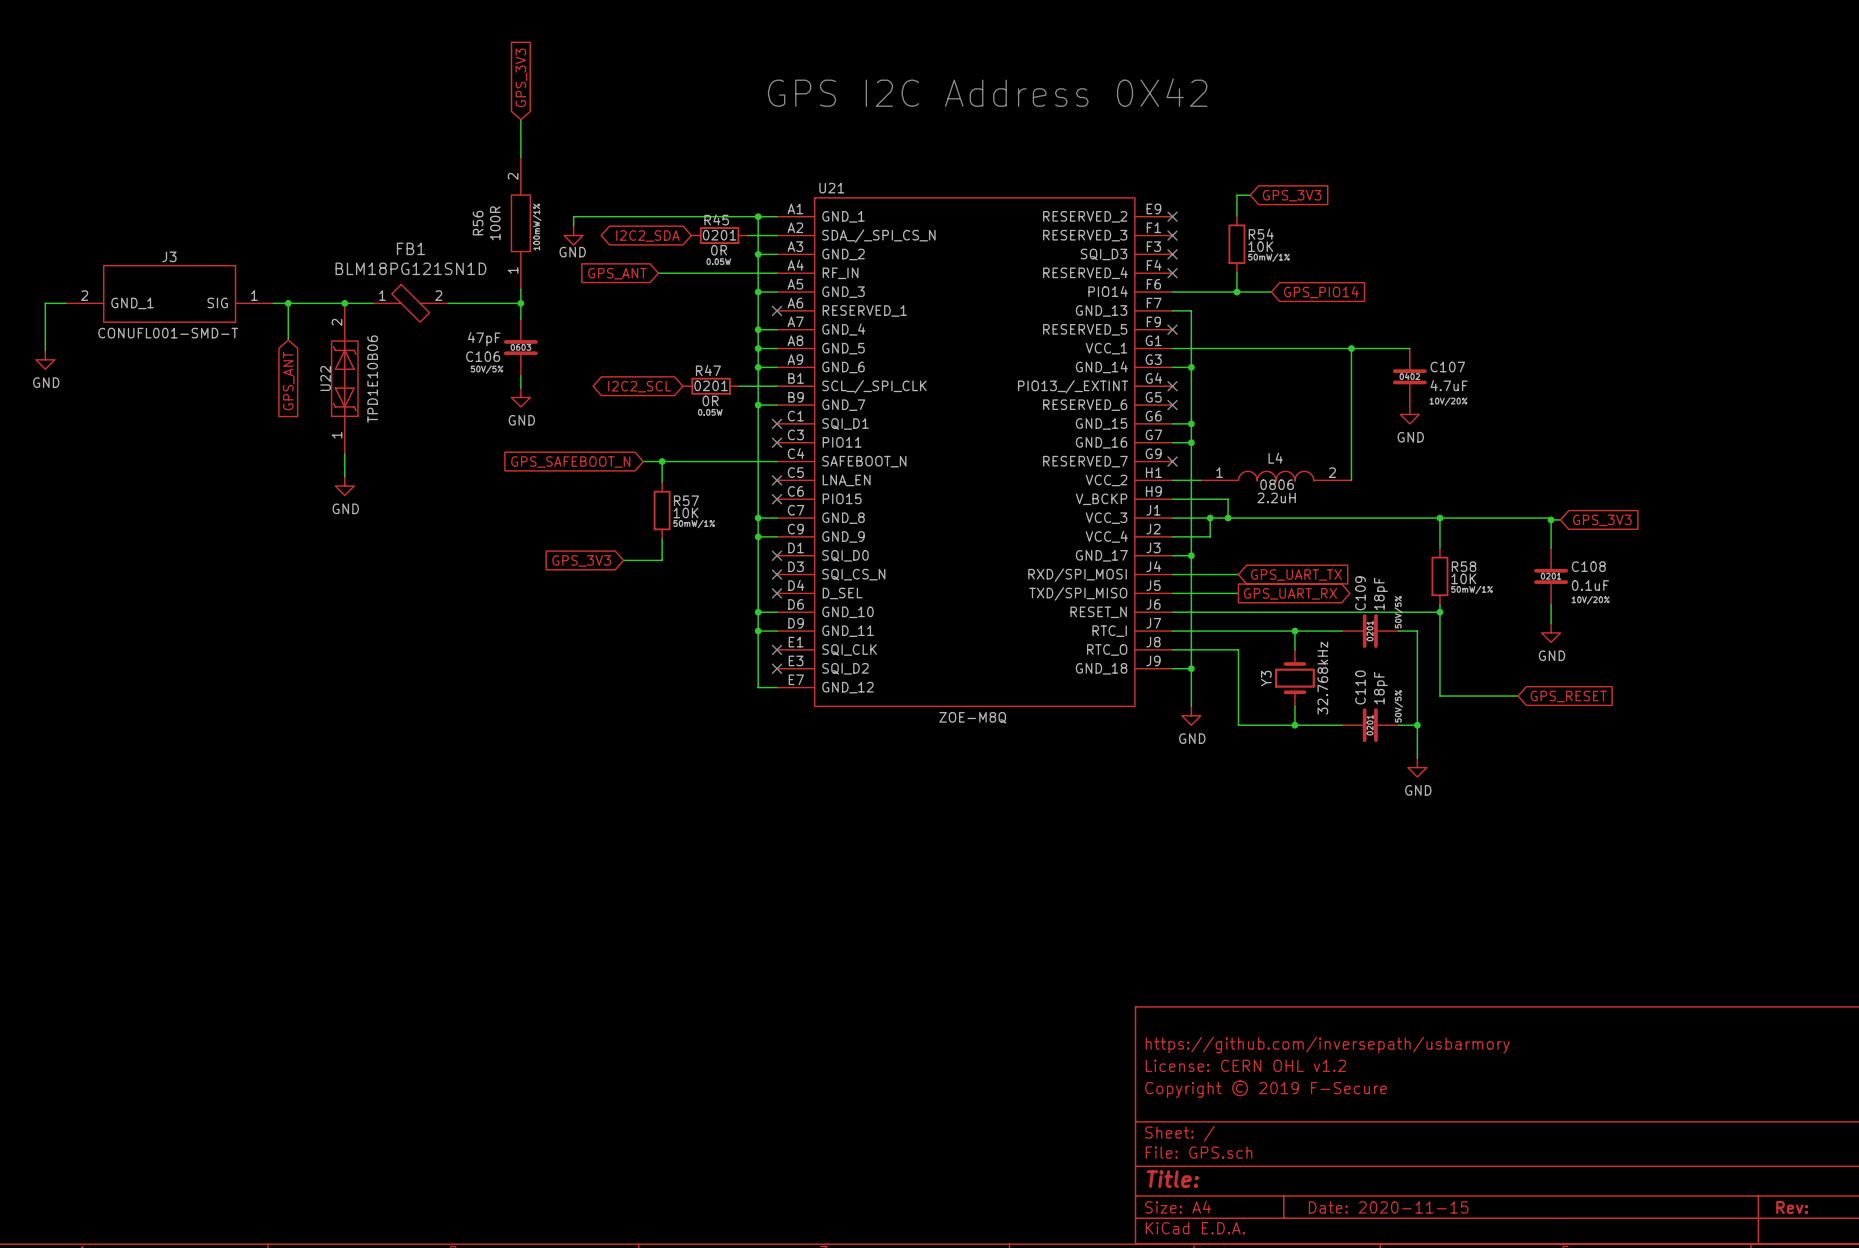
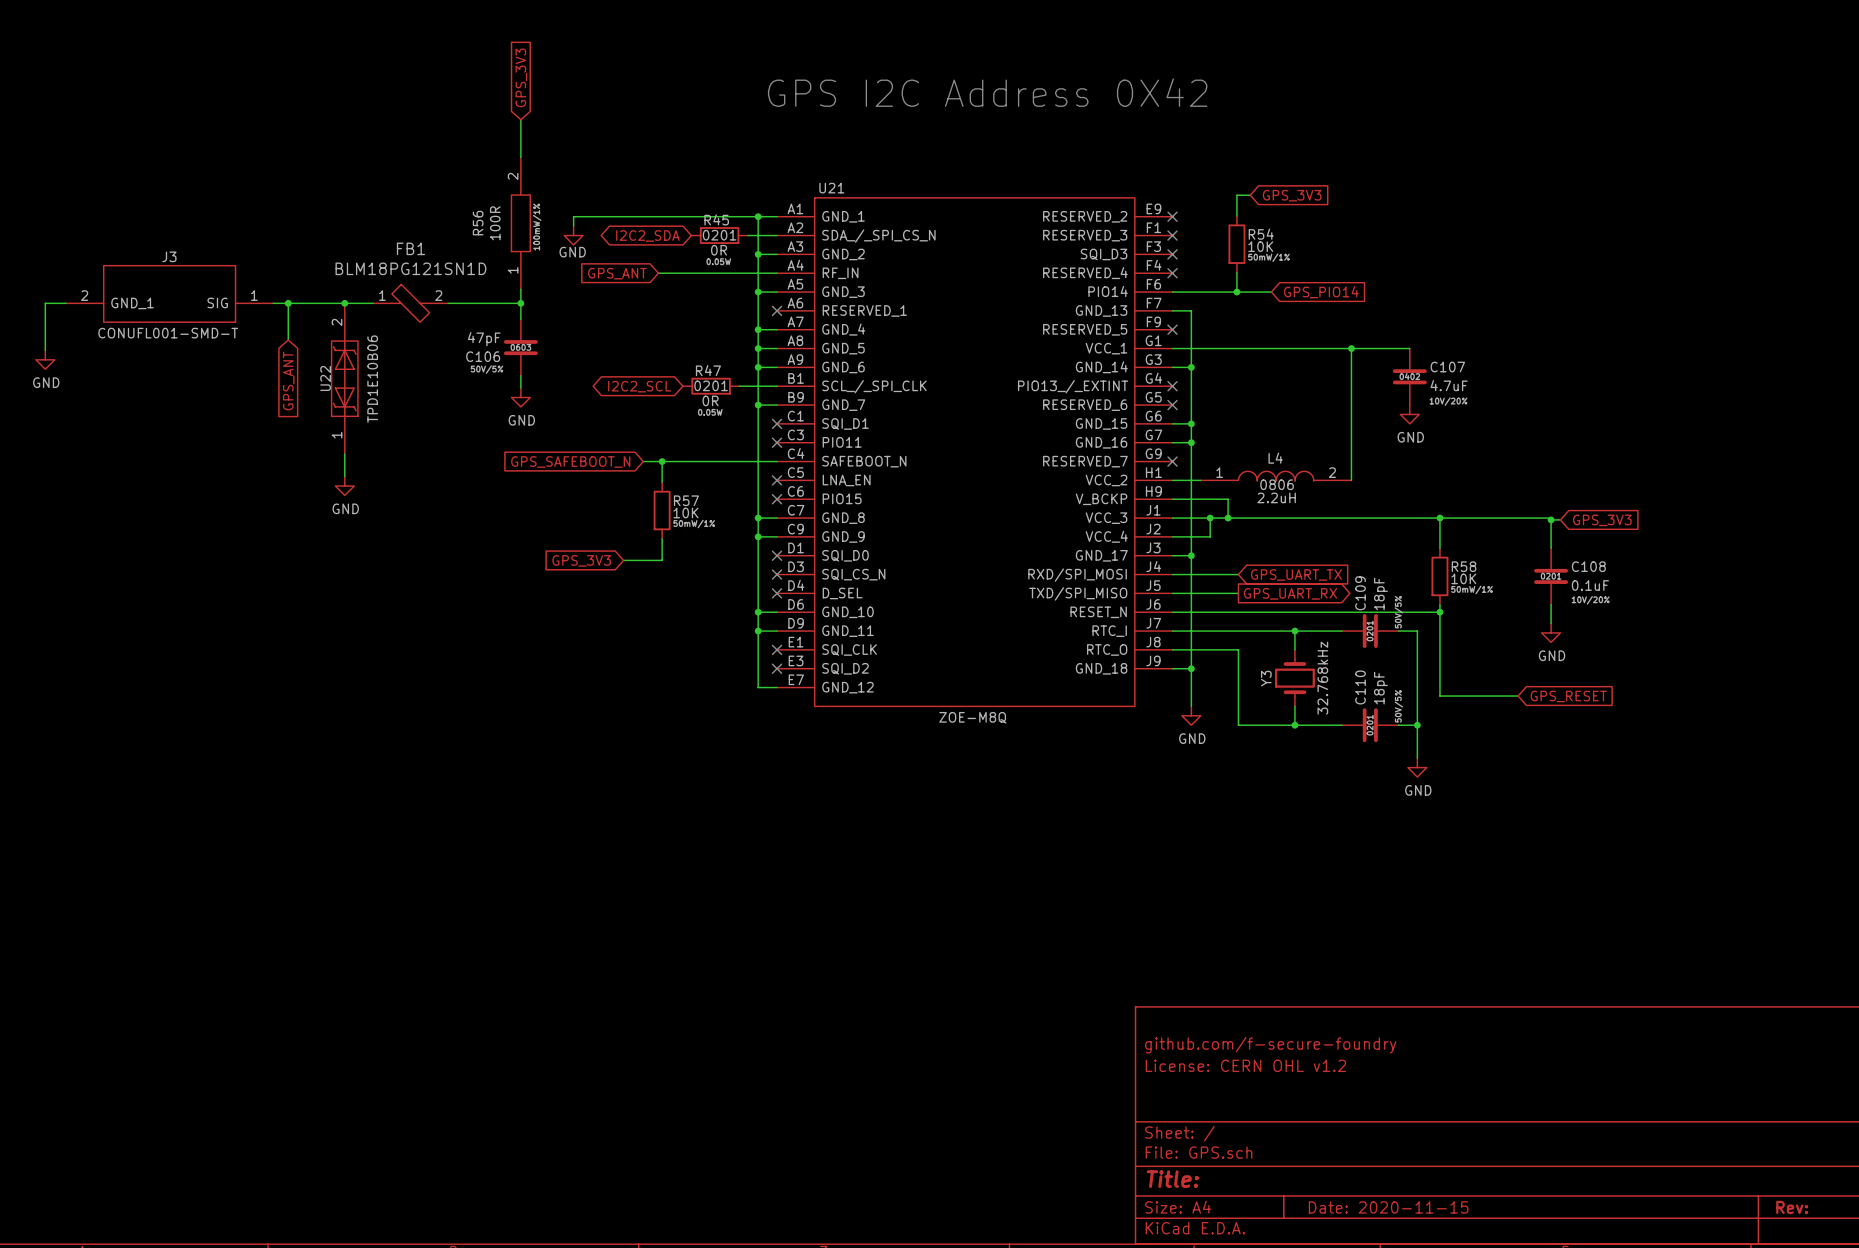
title block: https://github.com/inversepath/usbarmory (1327, 1045) -> github.com/f-secure-foundry (1270, 1045)
title block: Copyright © 2019 F-Secure (1266, 1089) -> none

